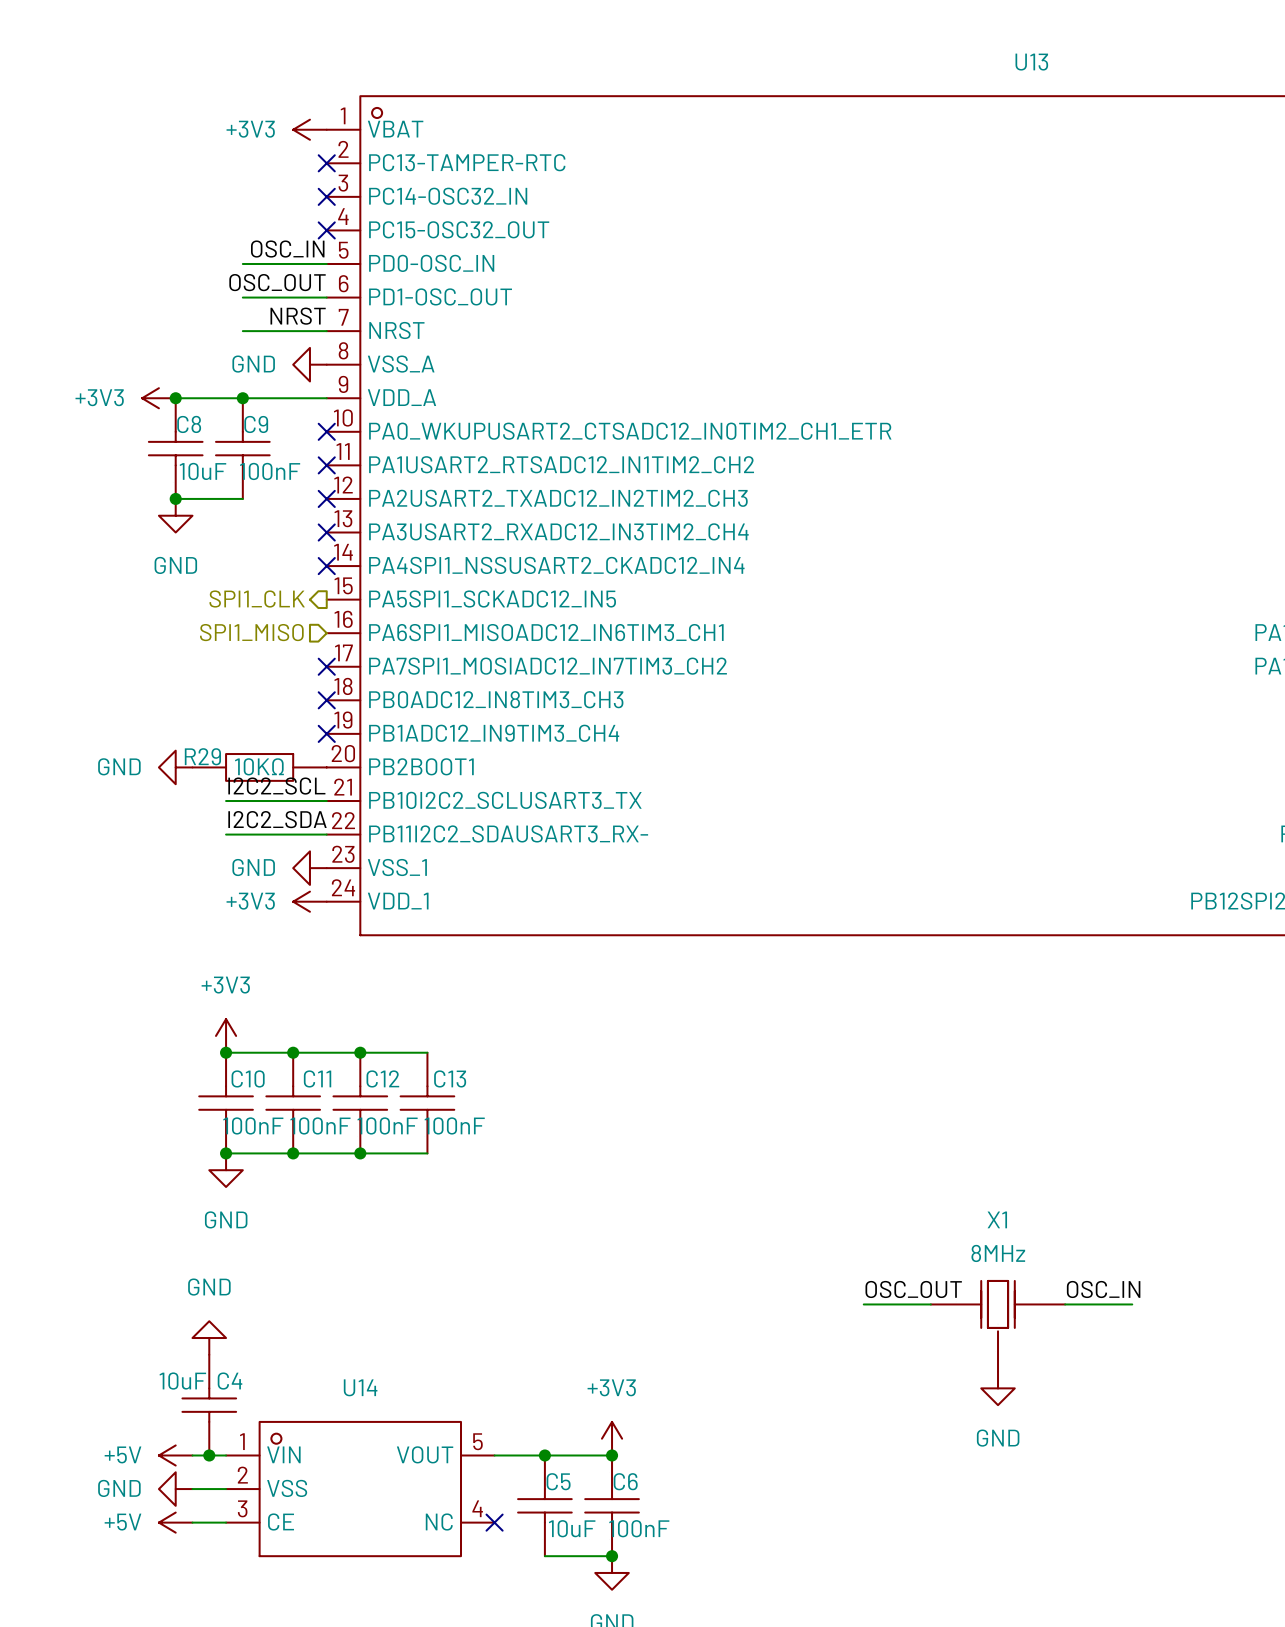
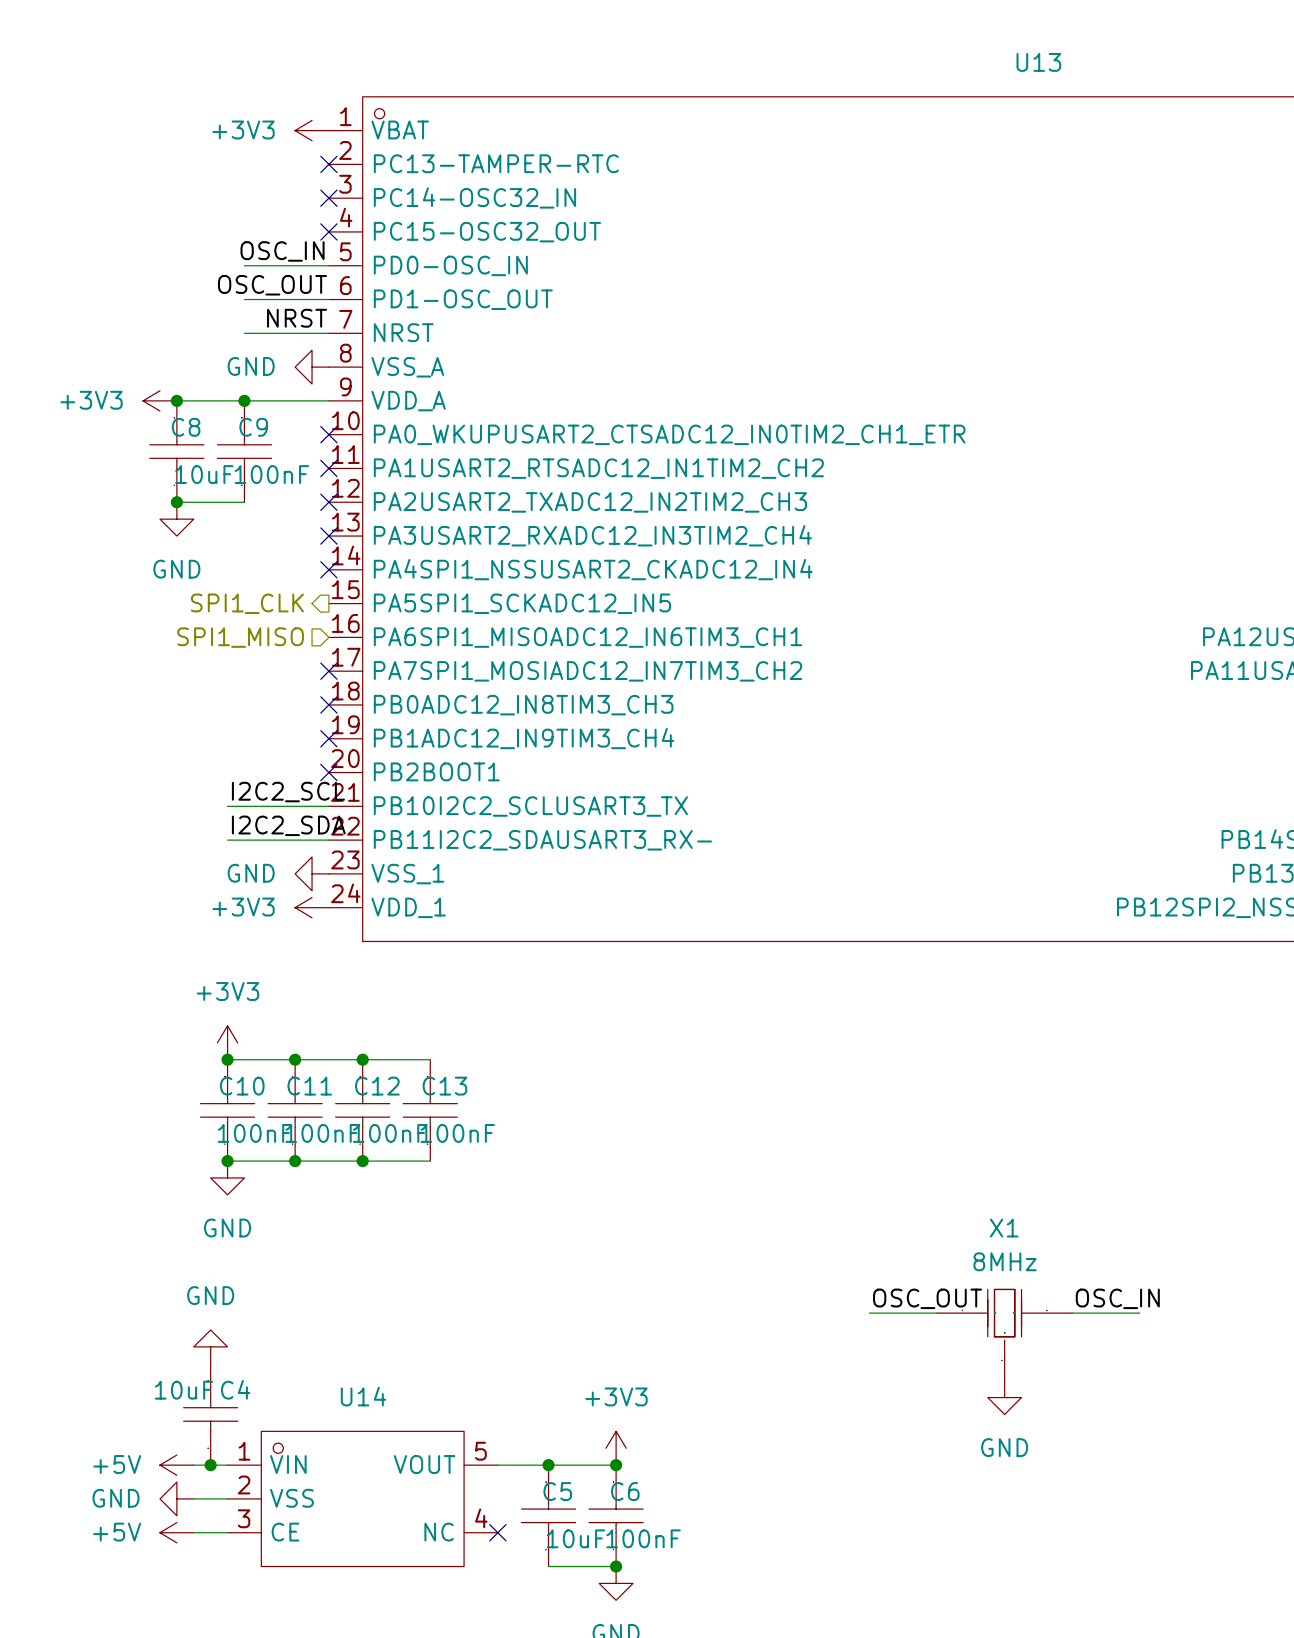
power symbol: GND (175, 767) -> none
R29: 10KΩ (259, 767) -> none
no-connect mark: none -> (328, 772)

